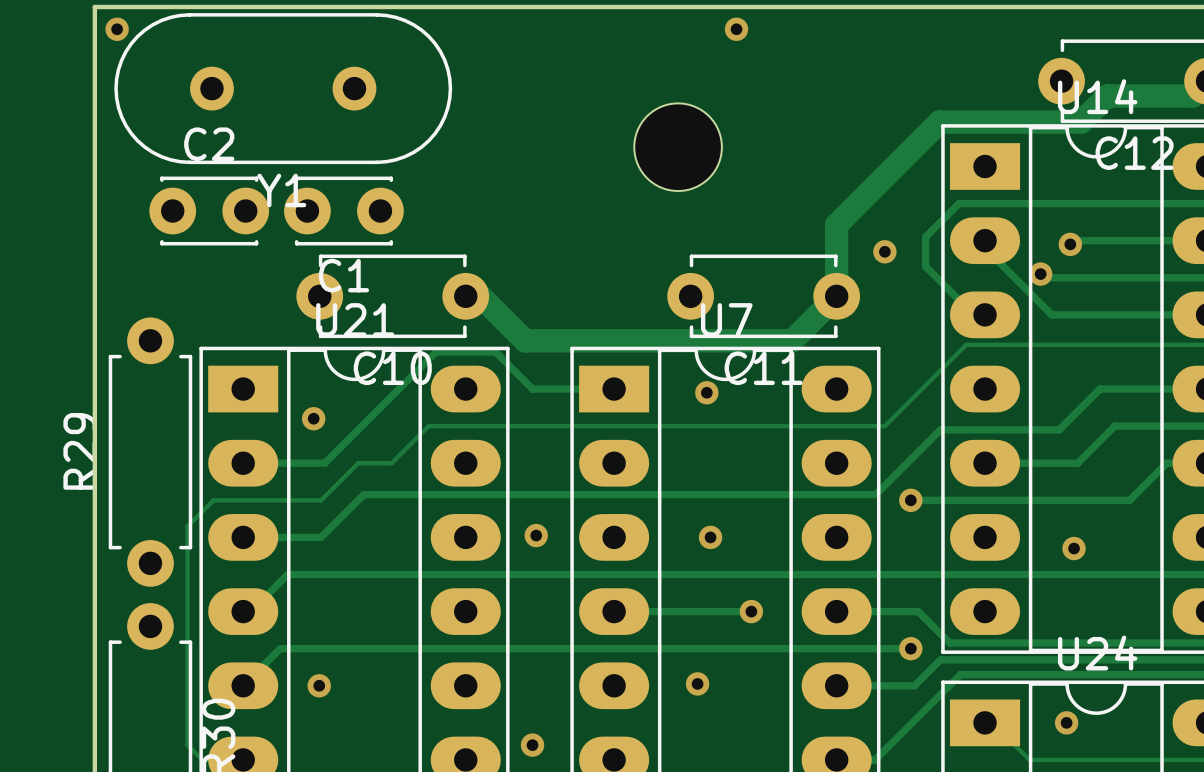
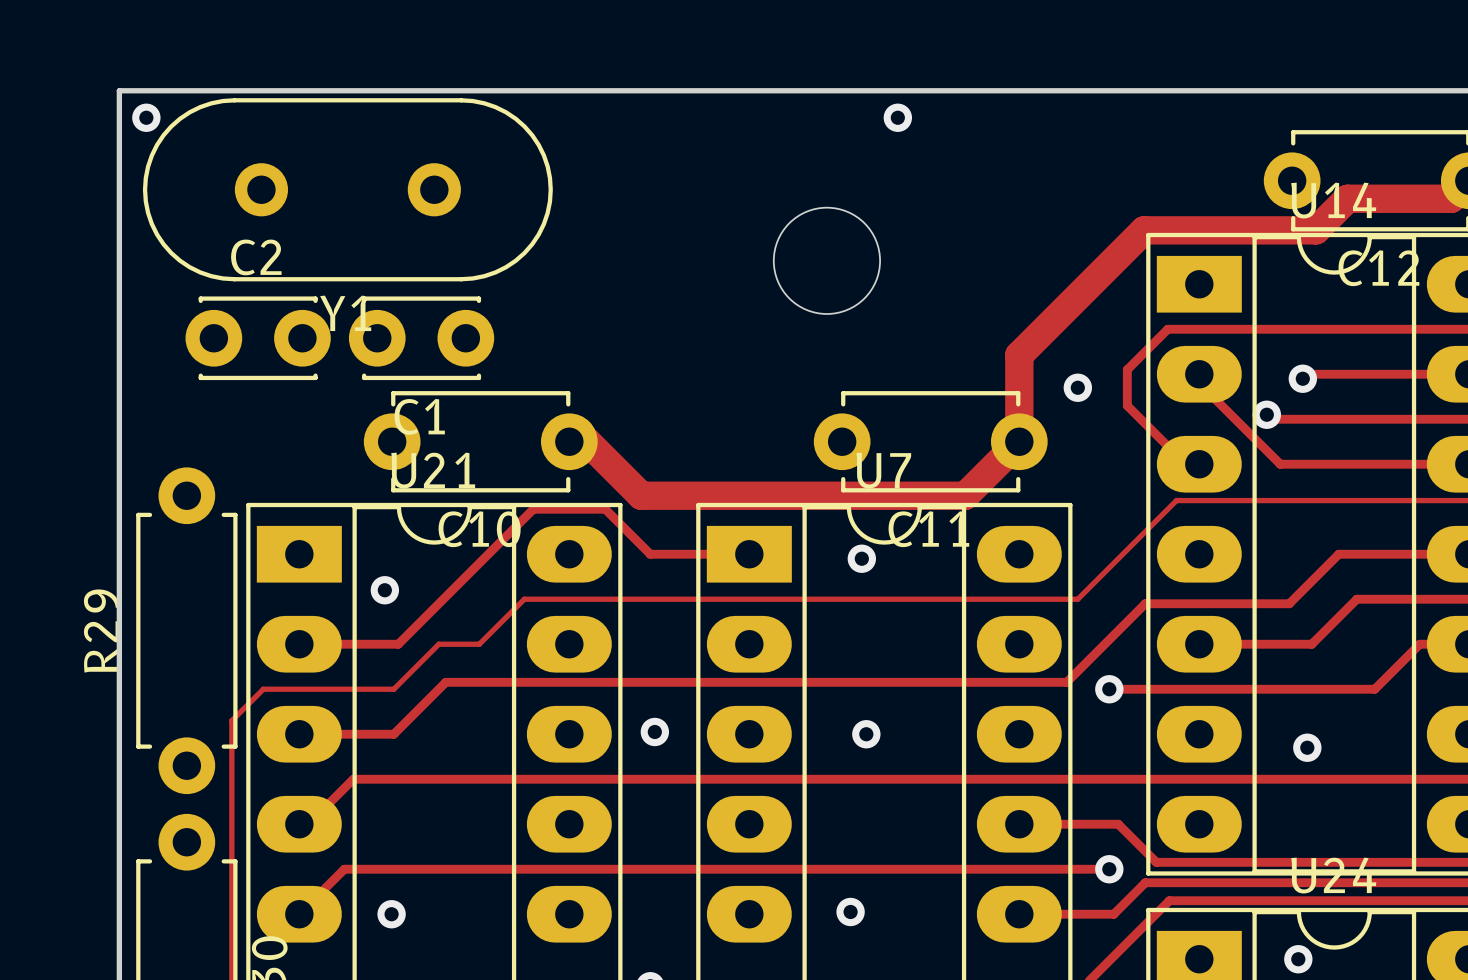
track: (614, 611) (751, 611) -> none
via: (751, 611) -> none

